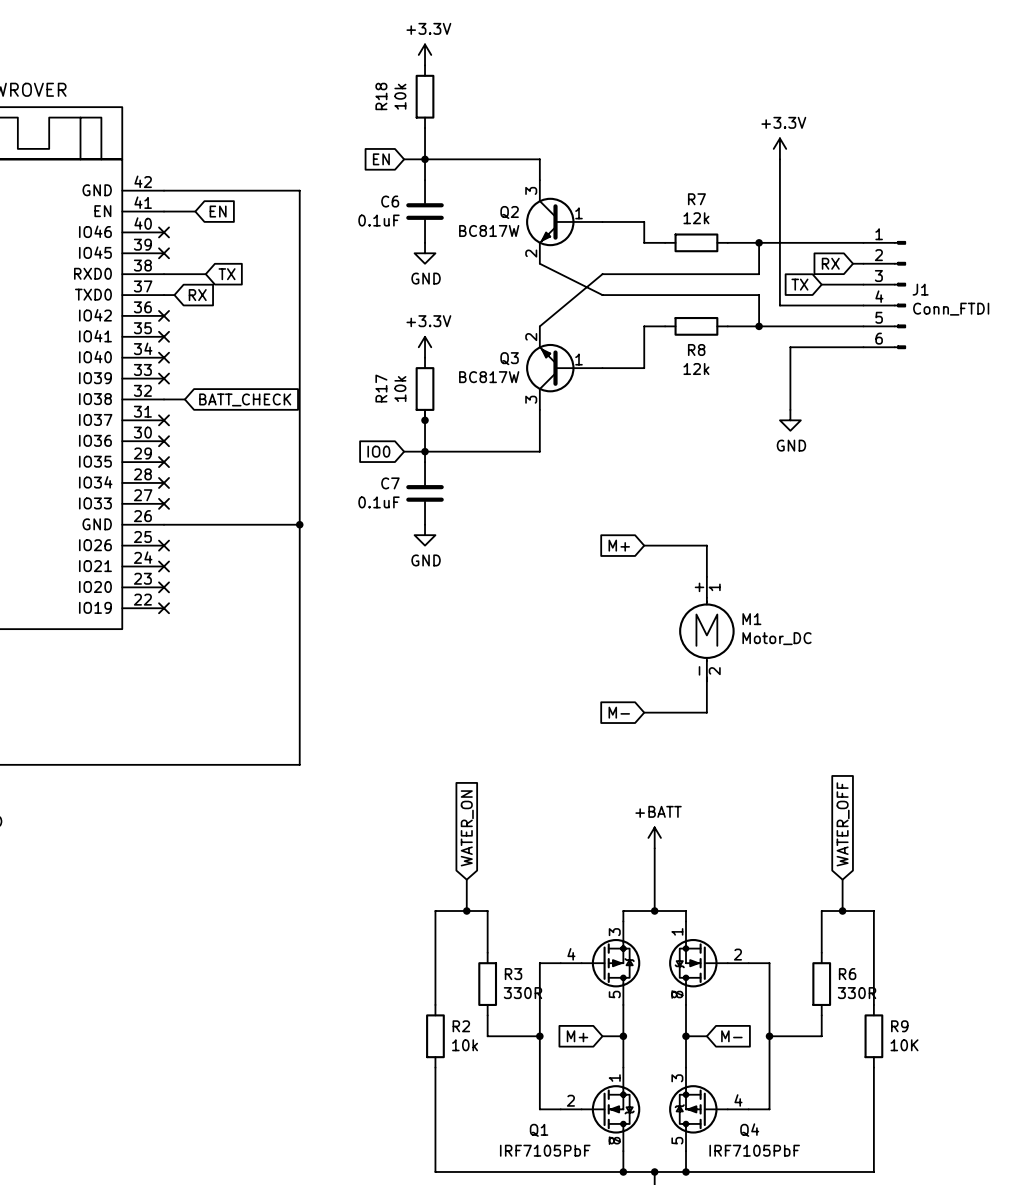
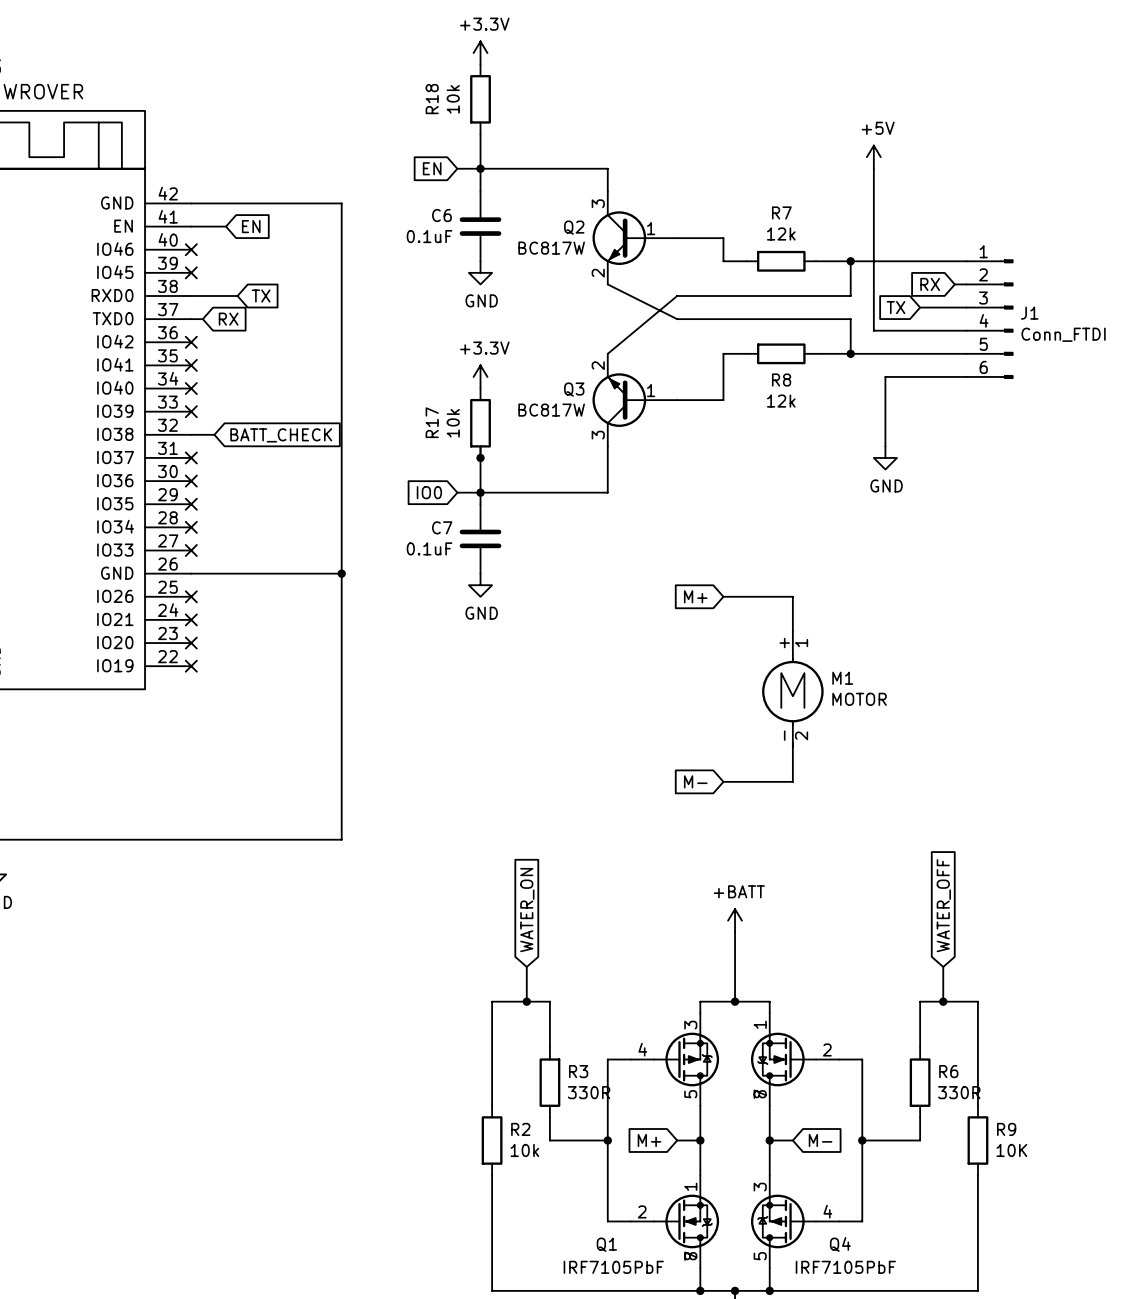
power symbol: +3.3V (779, 148) -> +5V (873, 157)
M1 value: Motor_DC (776, 638) -> MOTOR (859, 699)

